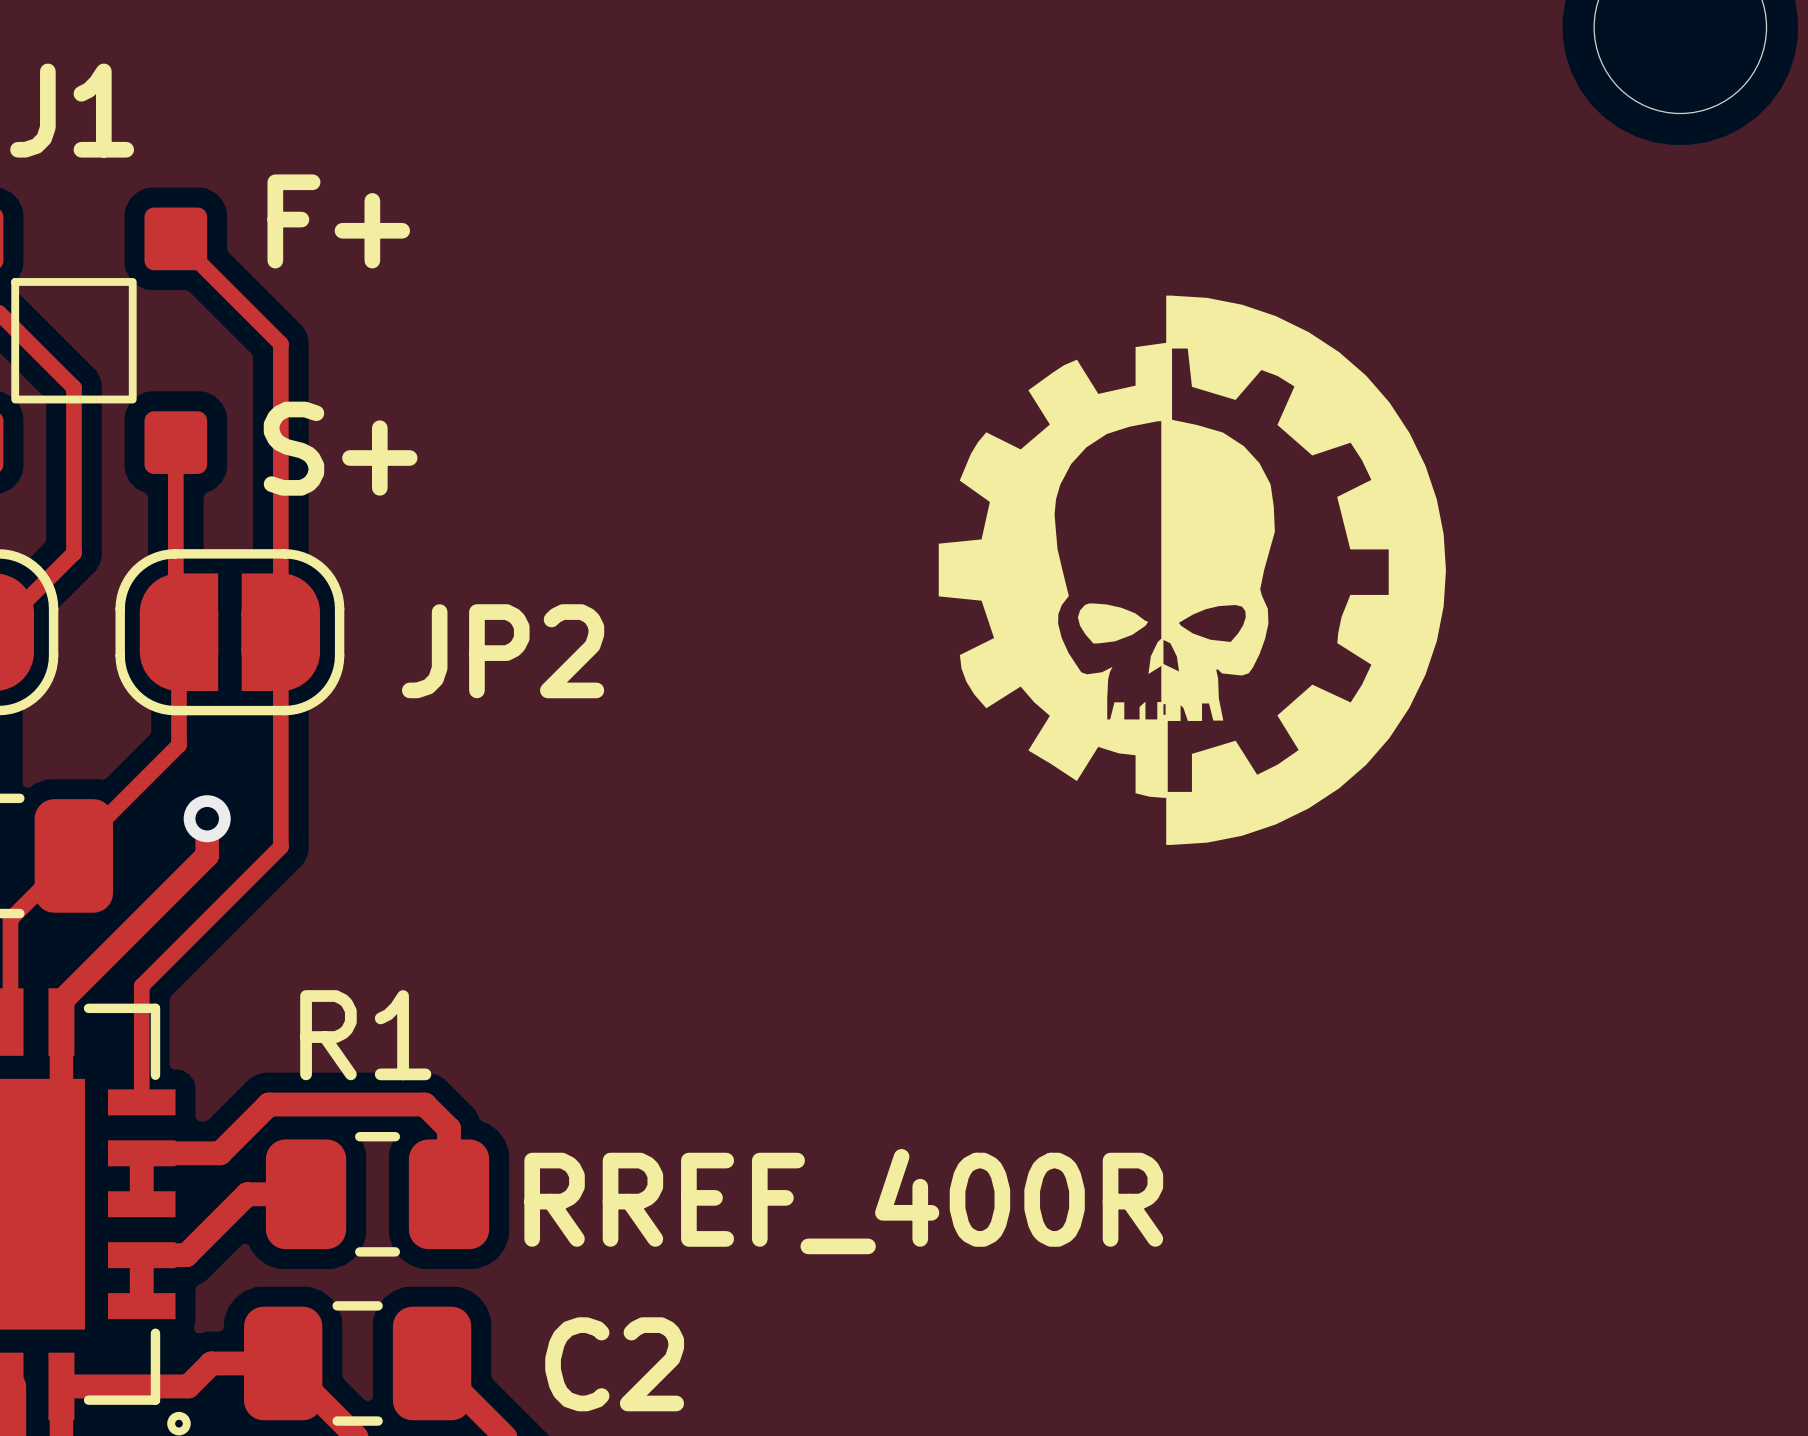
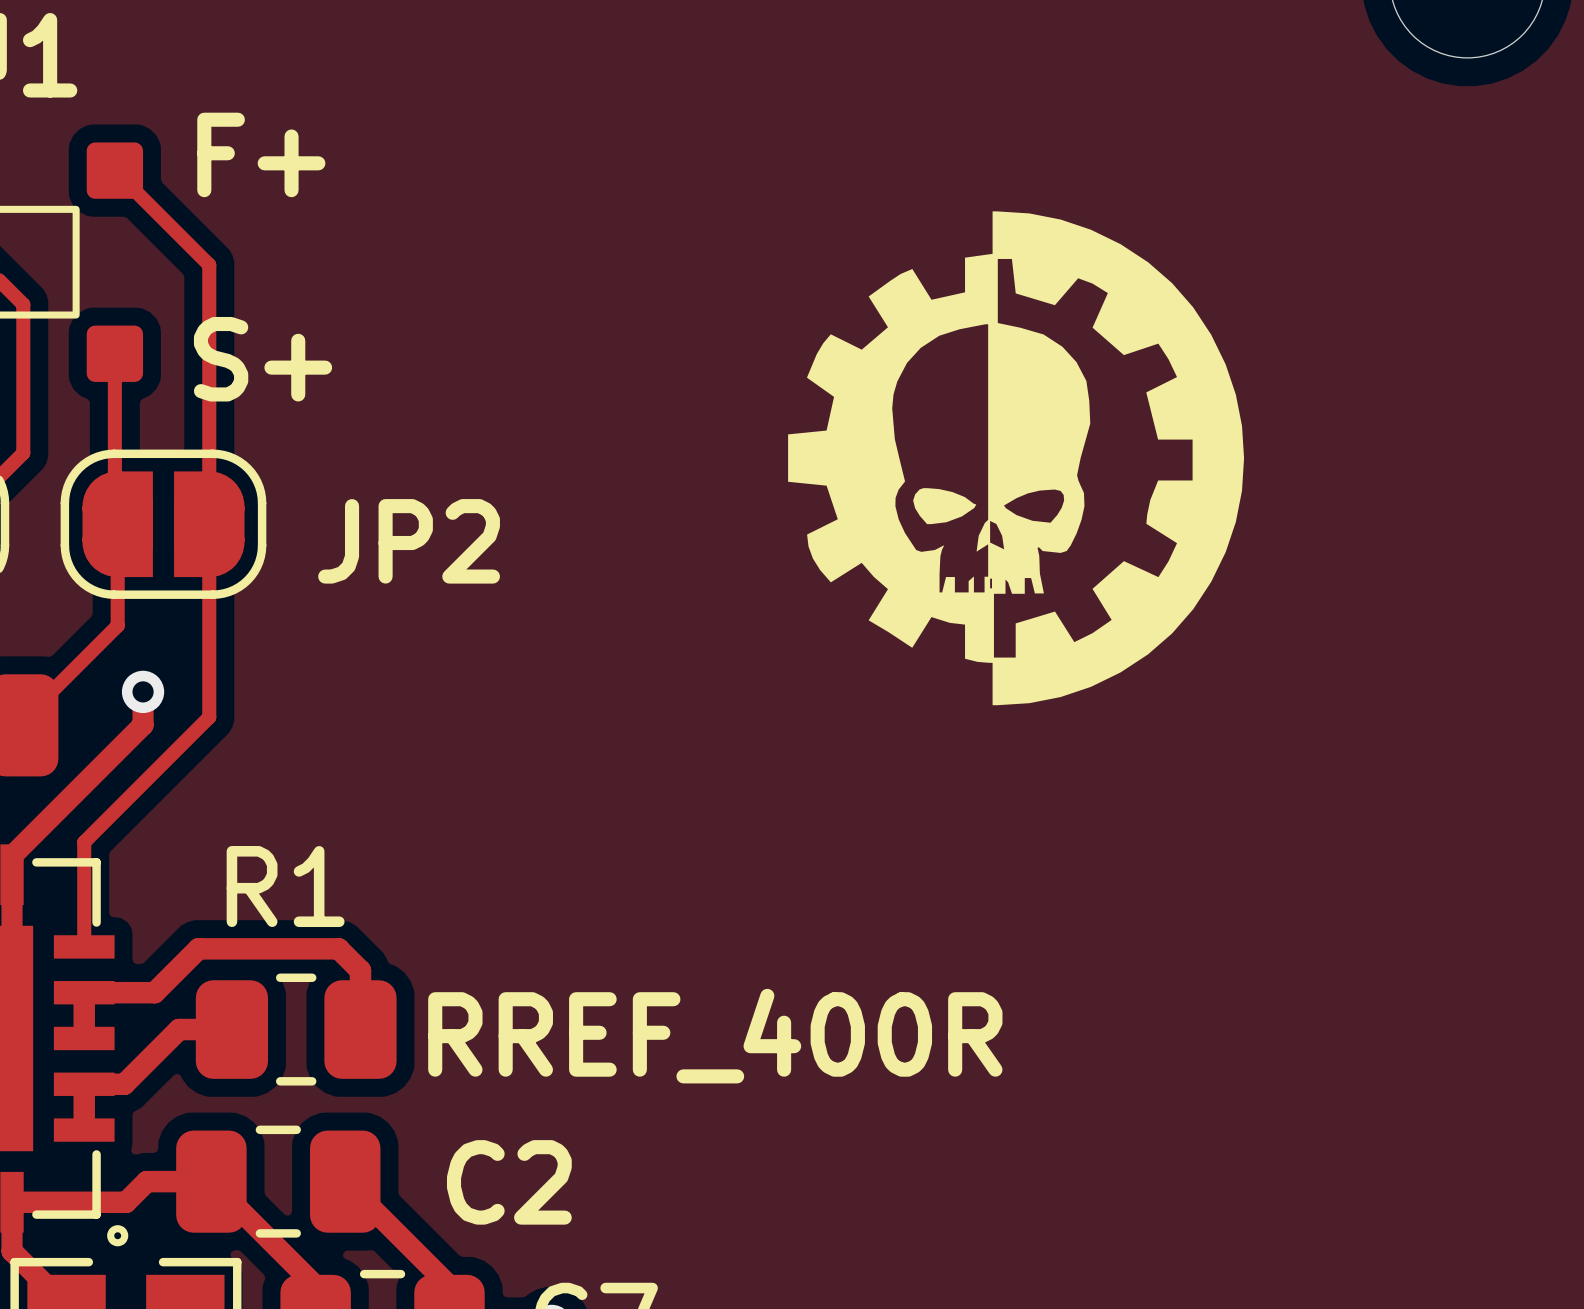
drawing position: (1192, 570) -> (1016, 458)
drawing position: (1112, 623) -> (944, 506)

